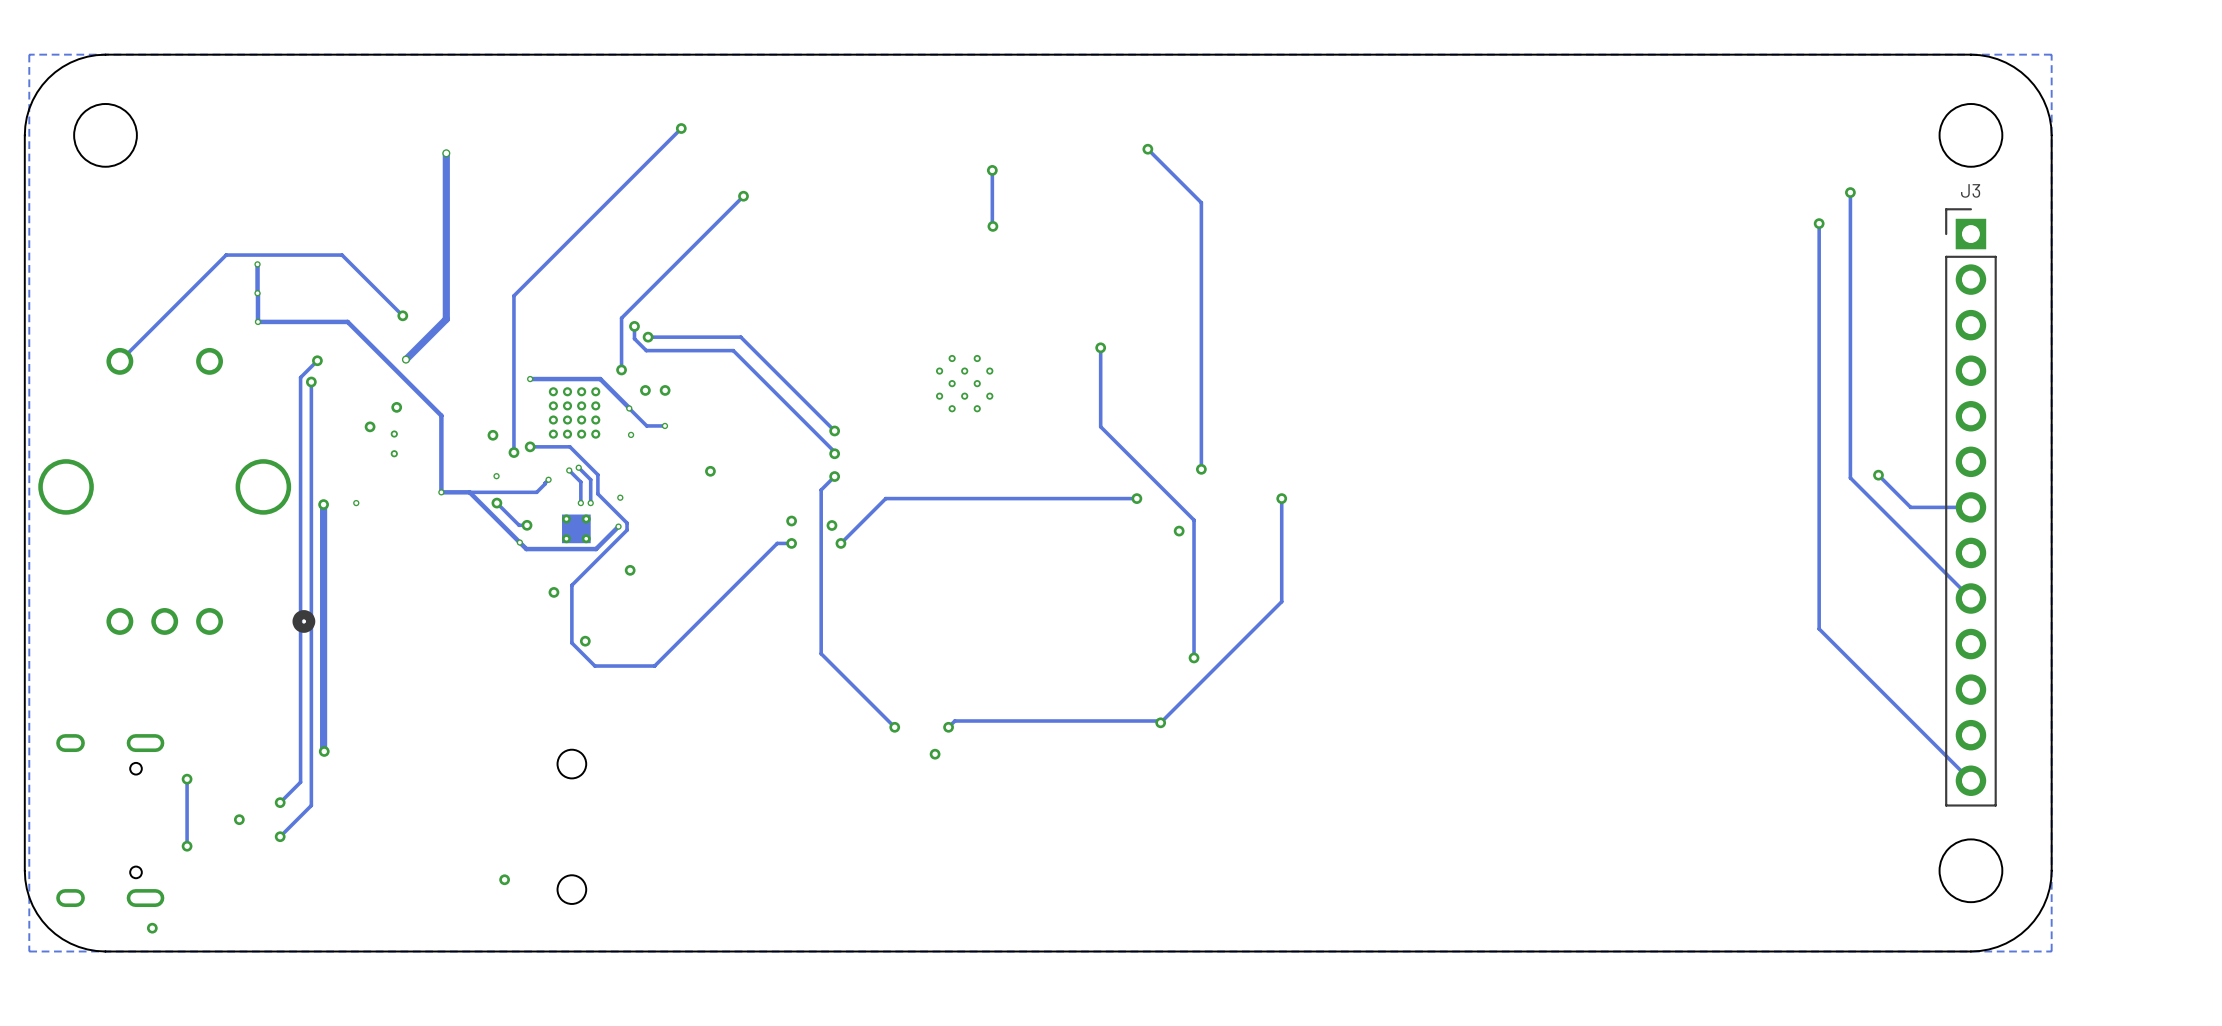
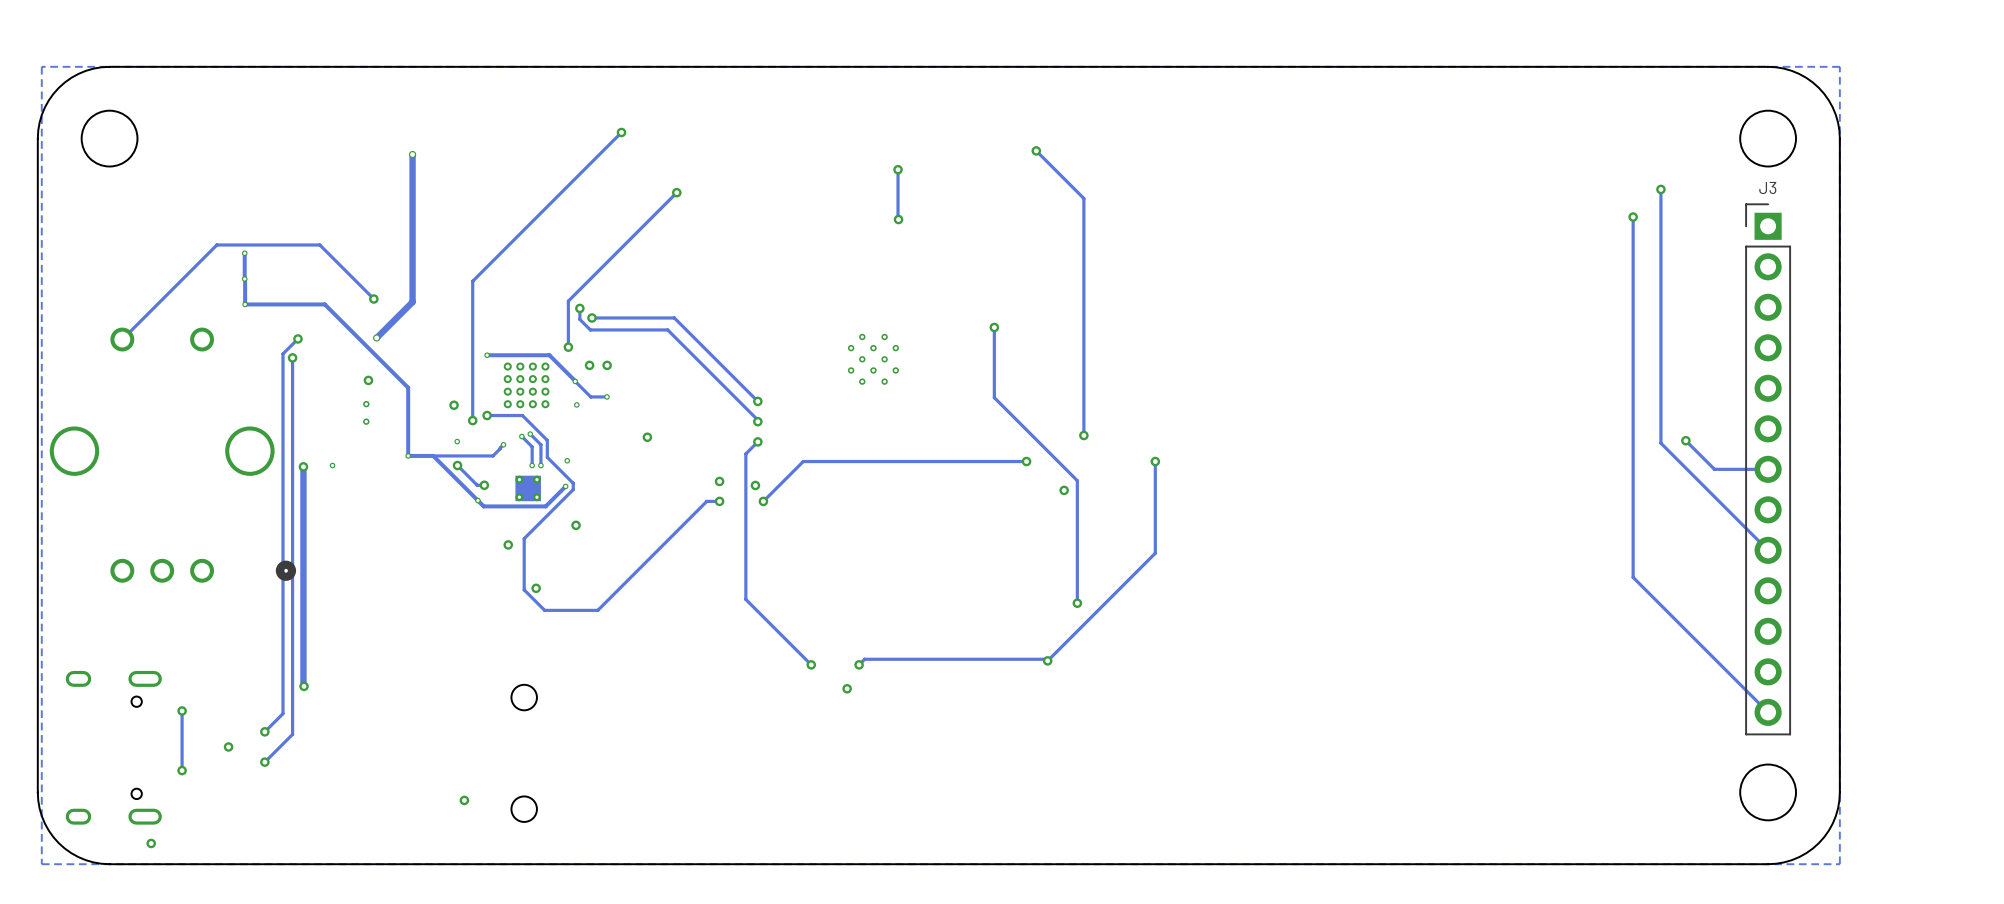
via: (370, 426) -> none

